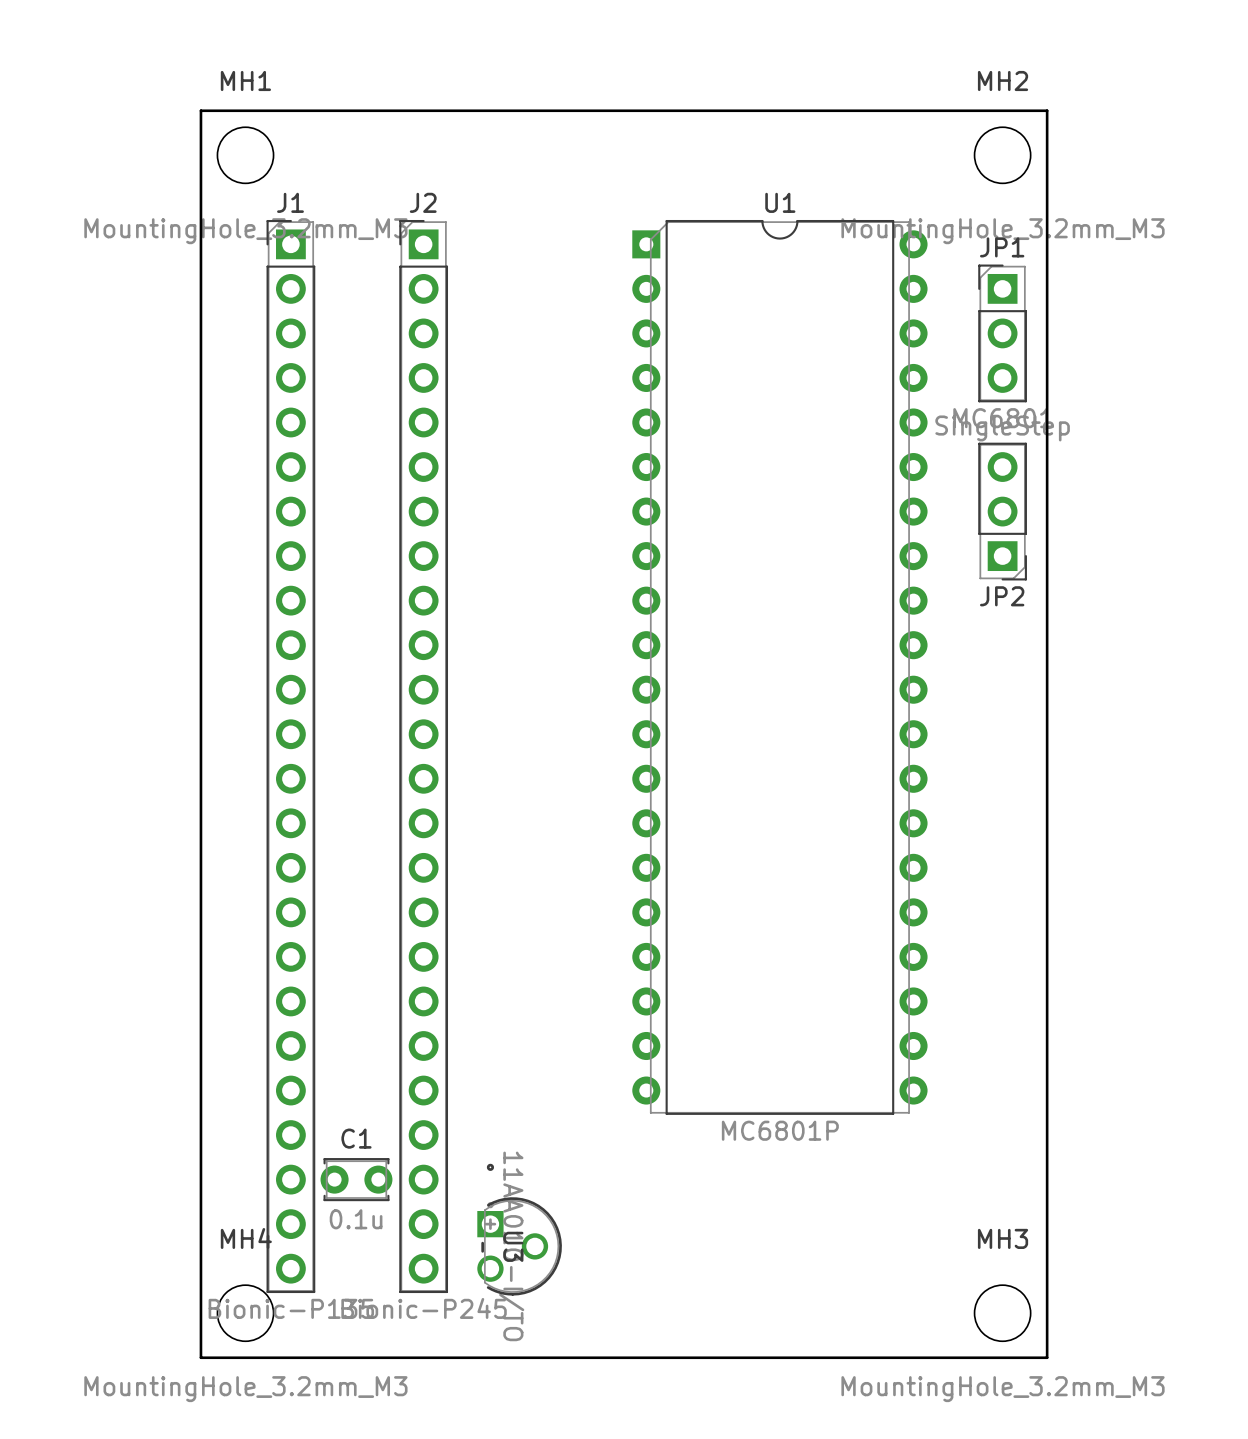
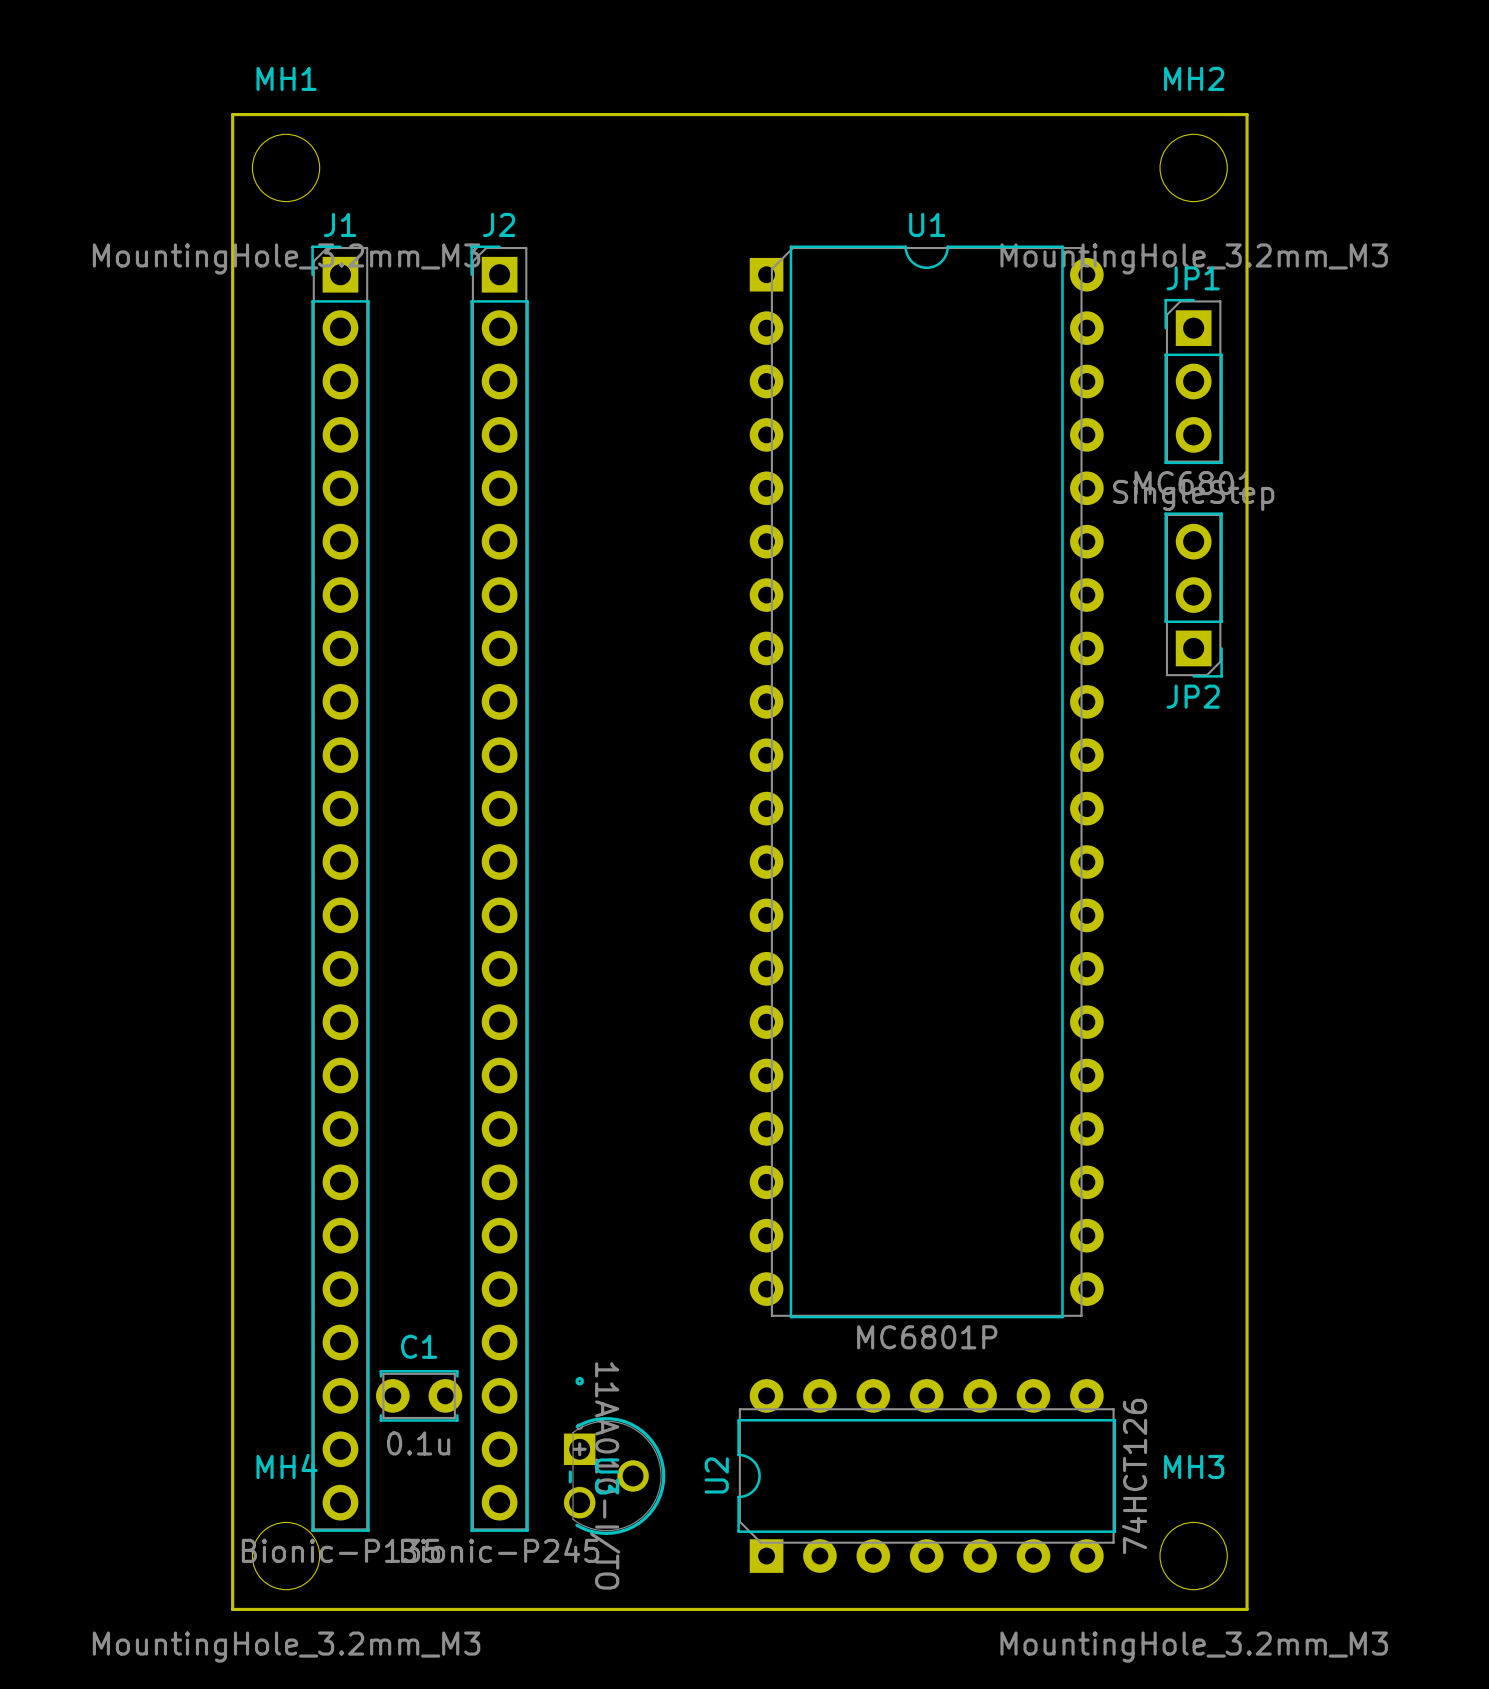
U2: none -> 74HCT126 (926, 1475)

